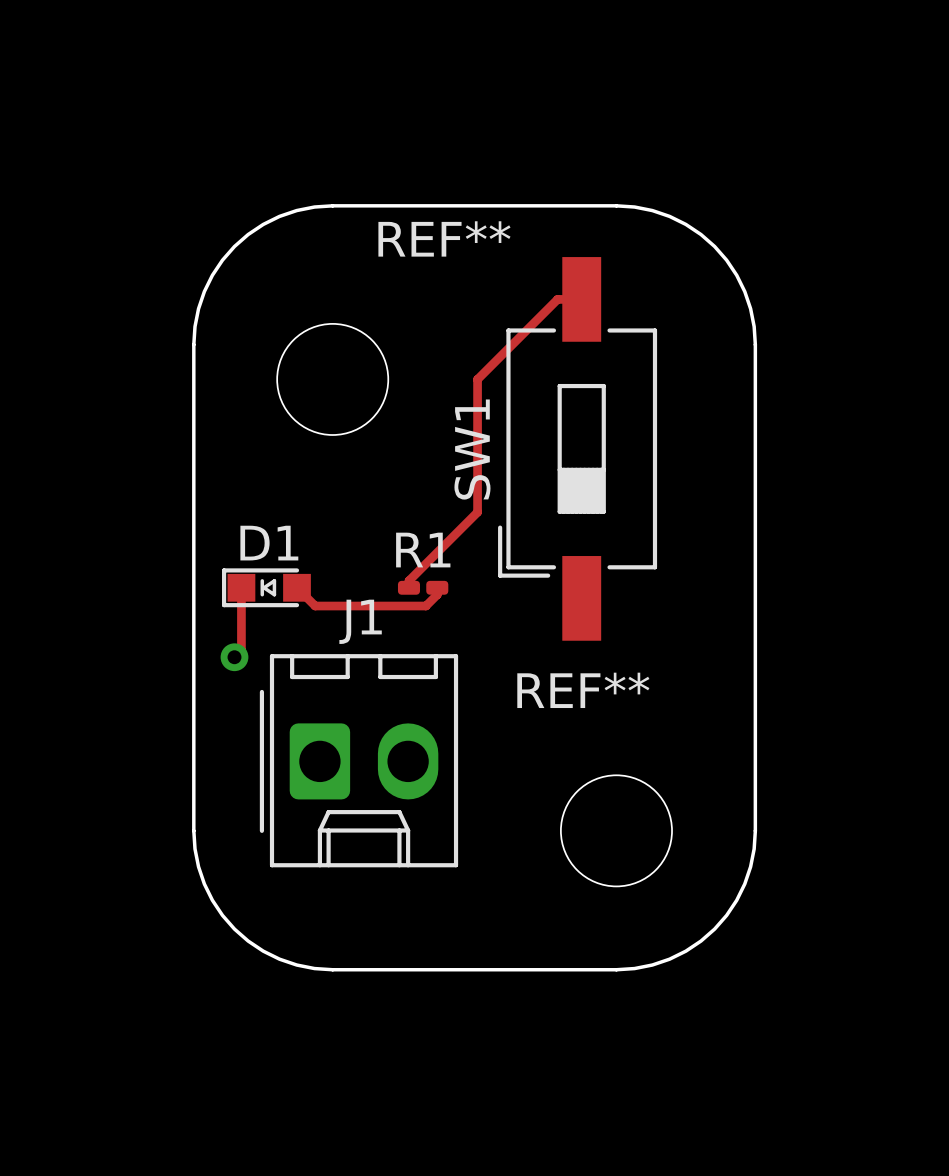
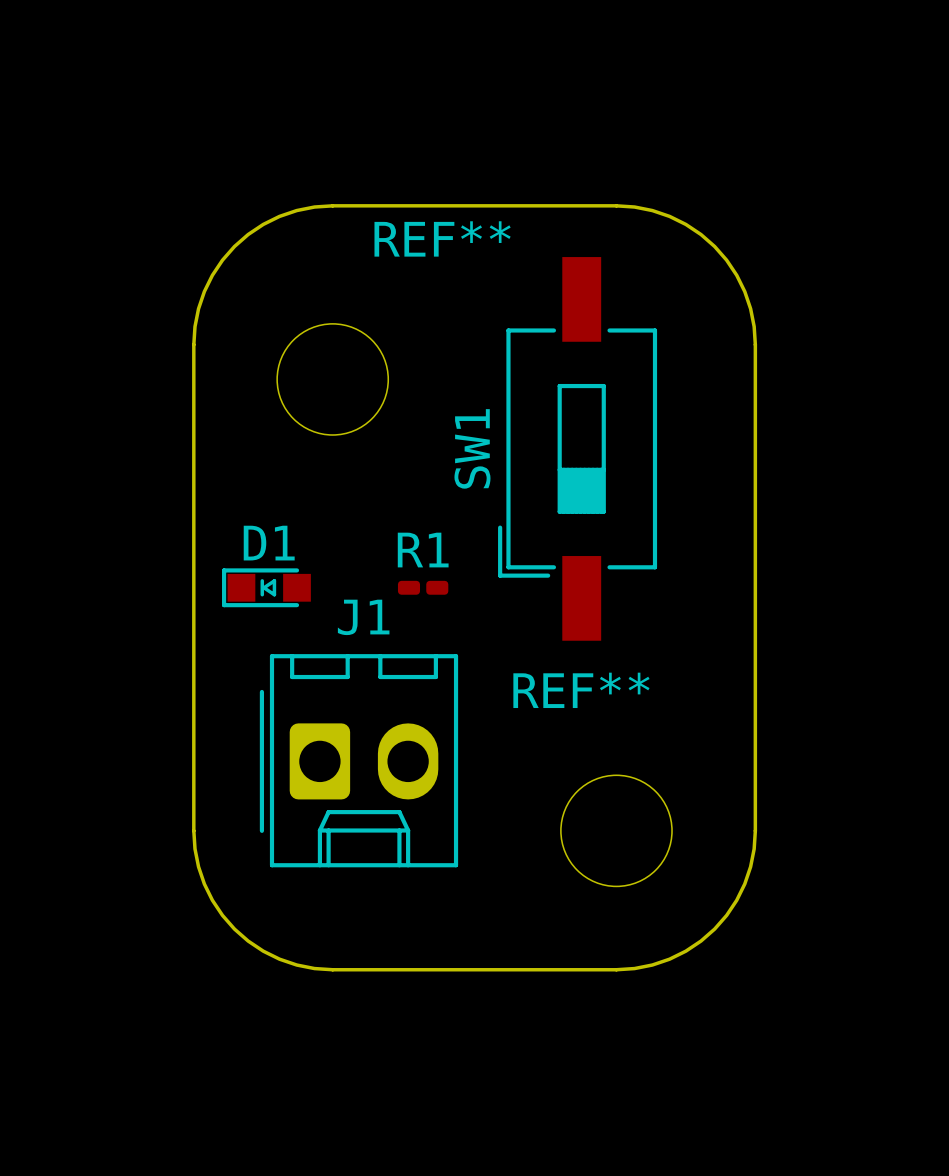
top track: (581, 299) (557, 299) (477, 379) (477, 512) (408, 580) (408, 587) -> none
top track: (241, 587) (241, 650) (234, 657) -> none
top track: (297, 587) (315, 606) (425, 606) (437, 594) (437, 587) -> none
via: (234, 657) -> none

